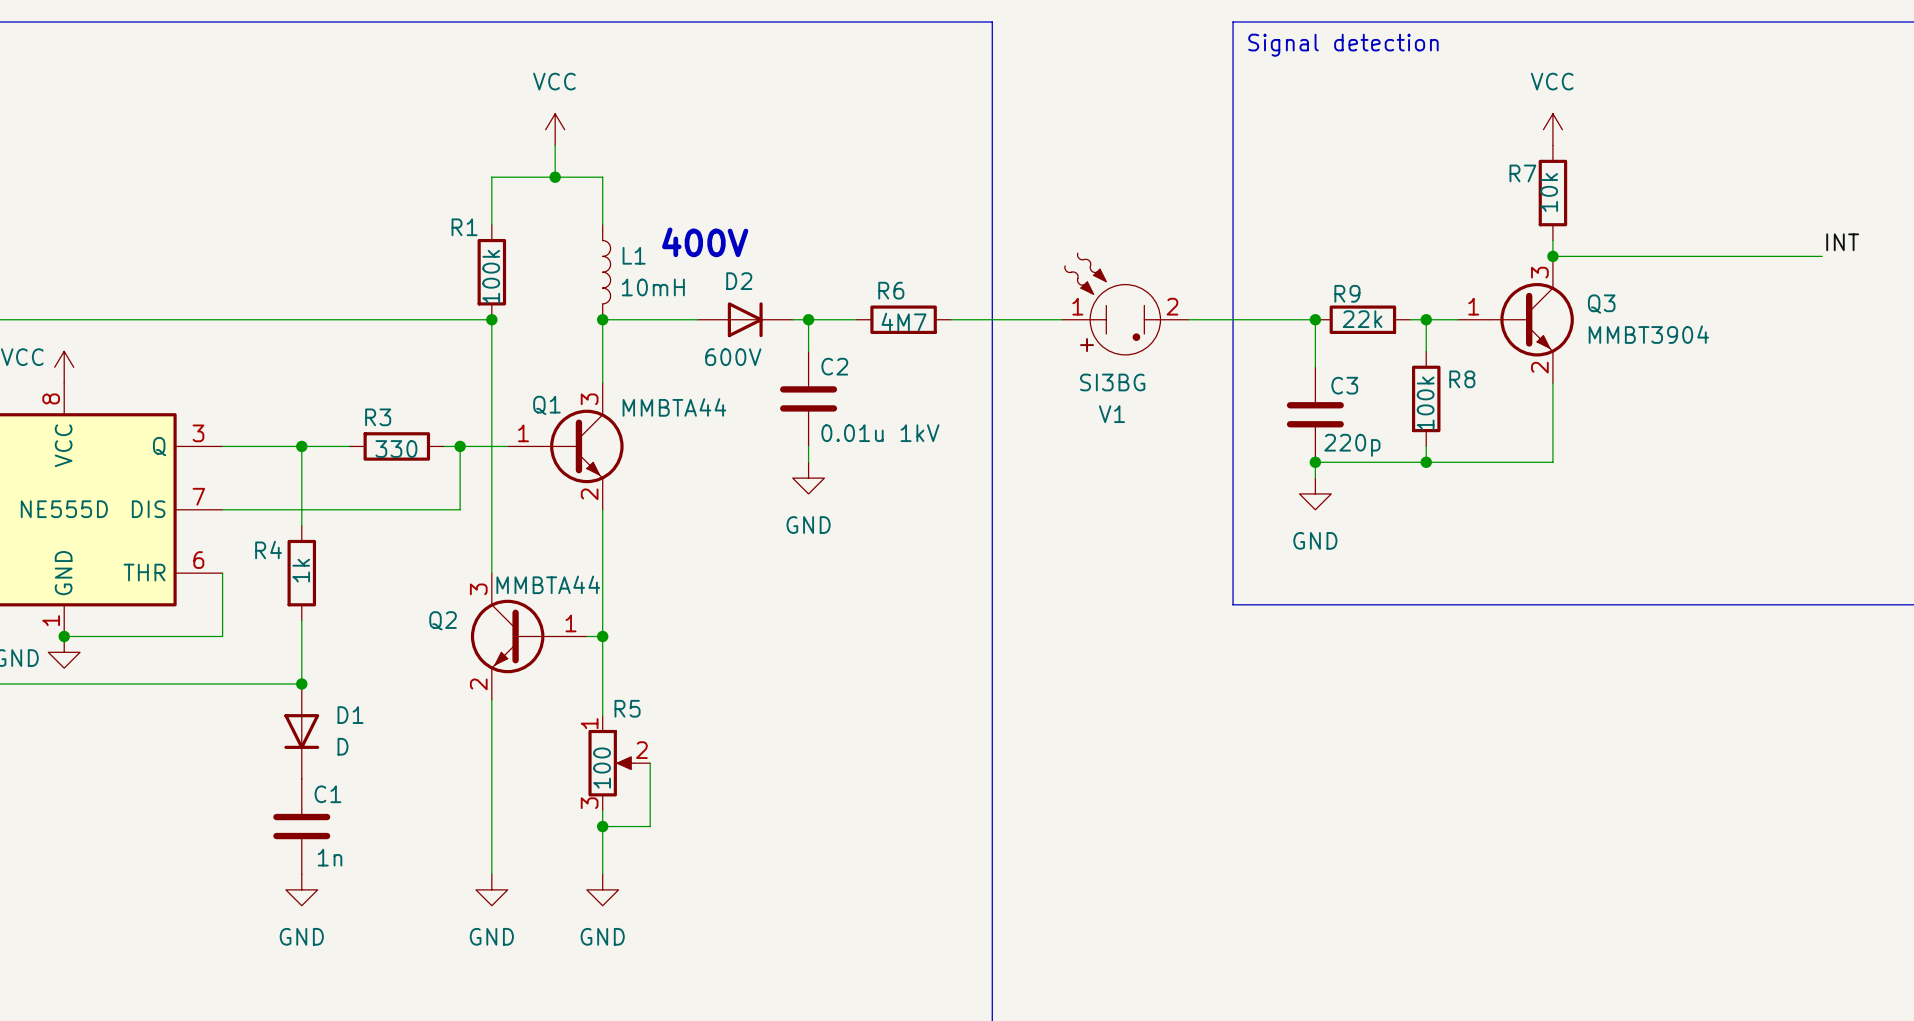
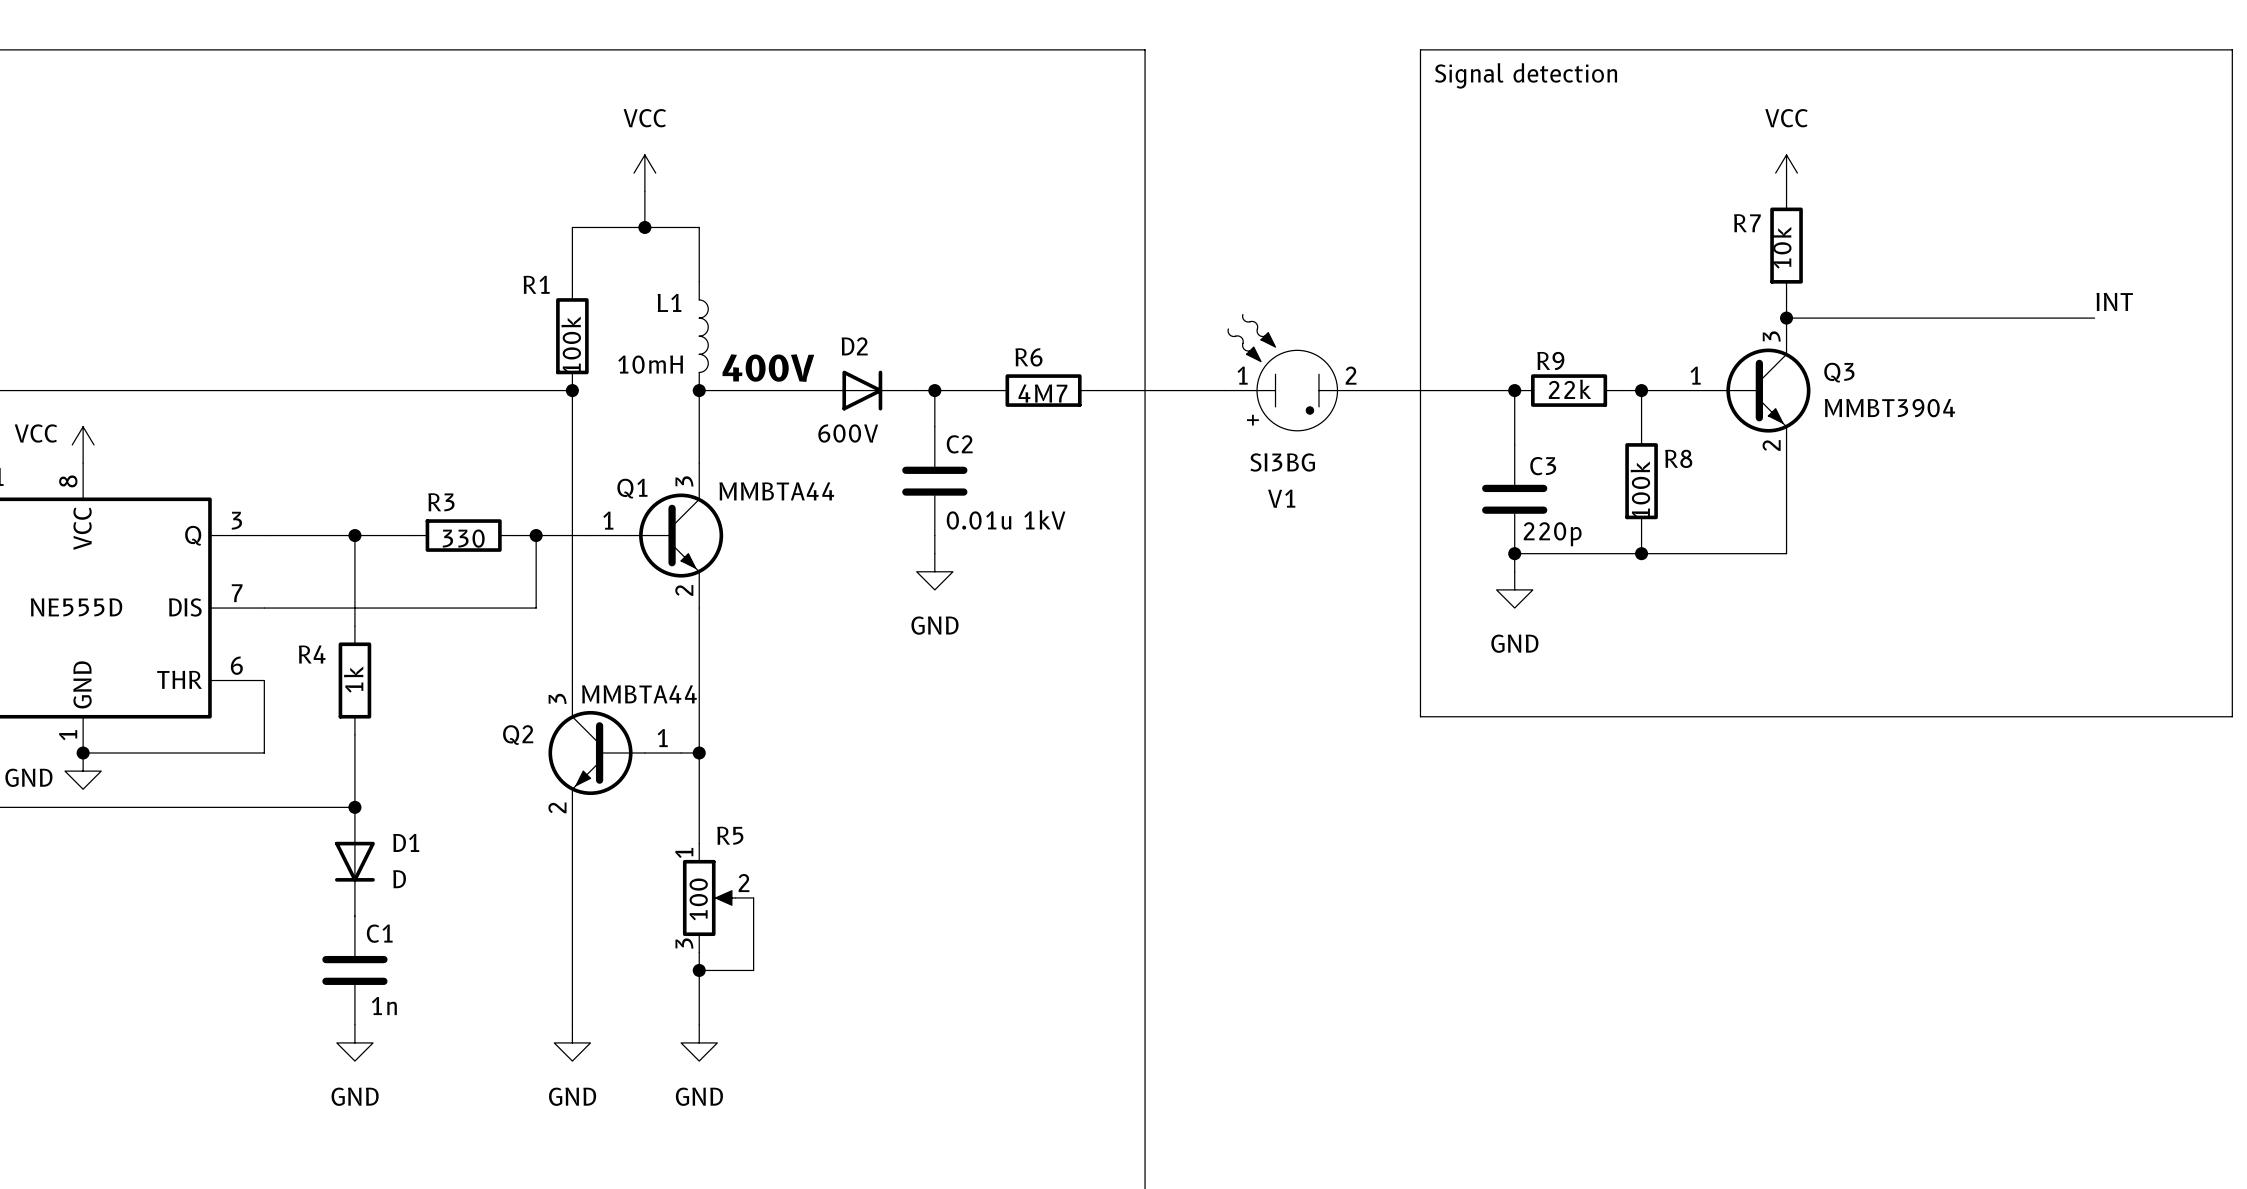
text position: 400V (705, 242) -> 400V (768, 368)
L1 name position: L1 (634, 255) -> L1 (669, 302)
L1 value position: 10mH (653, 287) -> 10mH (650, 364)

